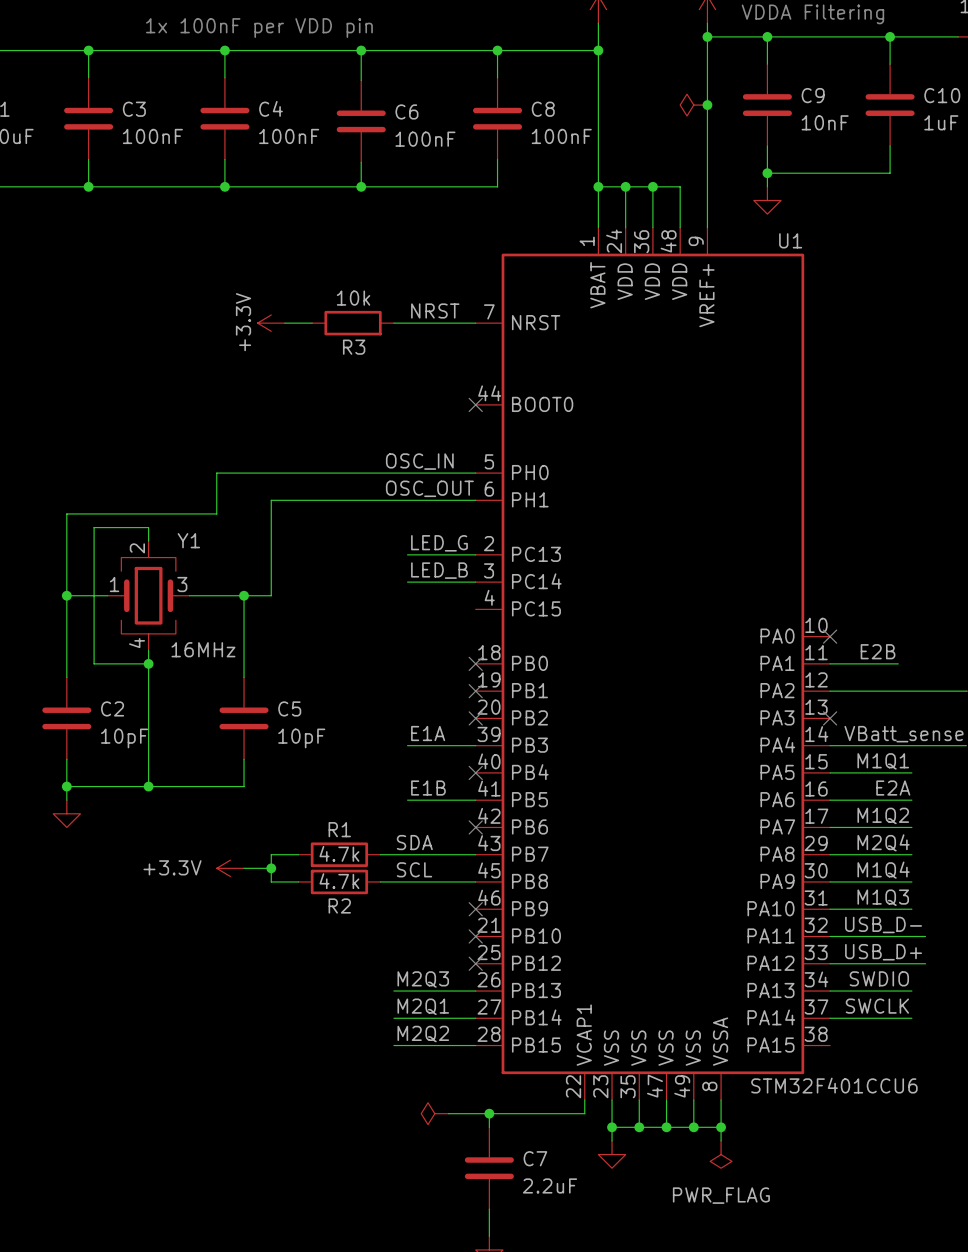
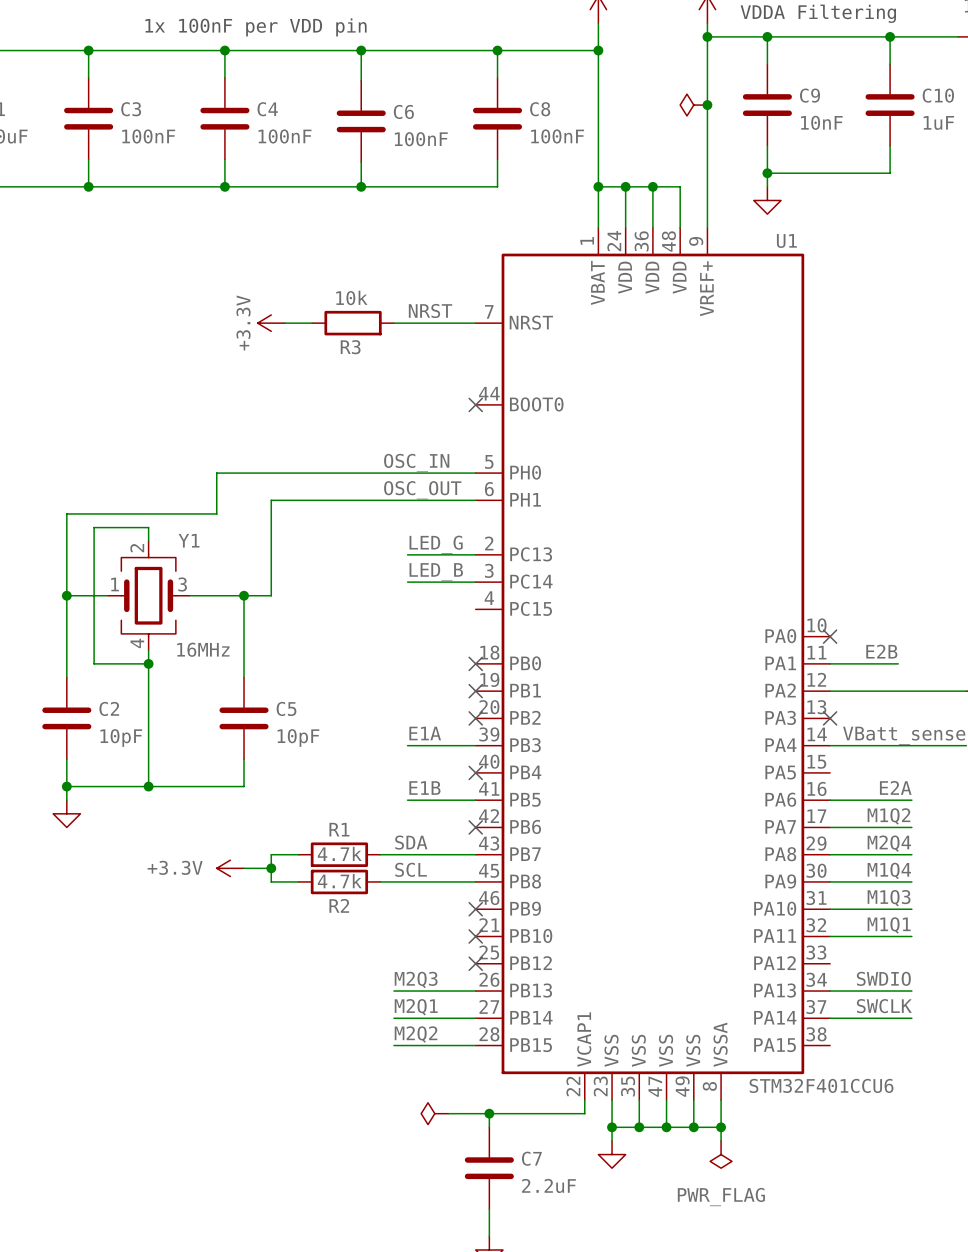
label position: M1Q1 (883, 761) -> M1Q1 (889, 925)
wire: (830, 772) (911, 772) -> none
label: USB_D- (883, 924) -> none
wire: (911, 936) (925, 936) -> none
label: USB_D+ (883, 952) -> none
wire: (830, 963) (925, 963) -> none

